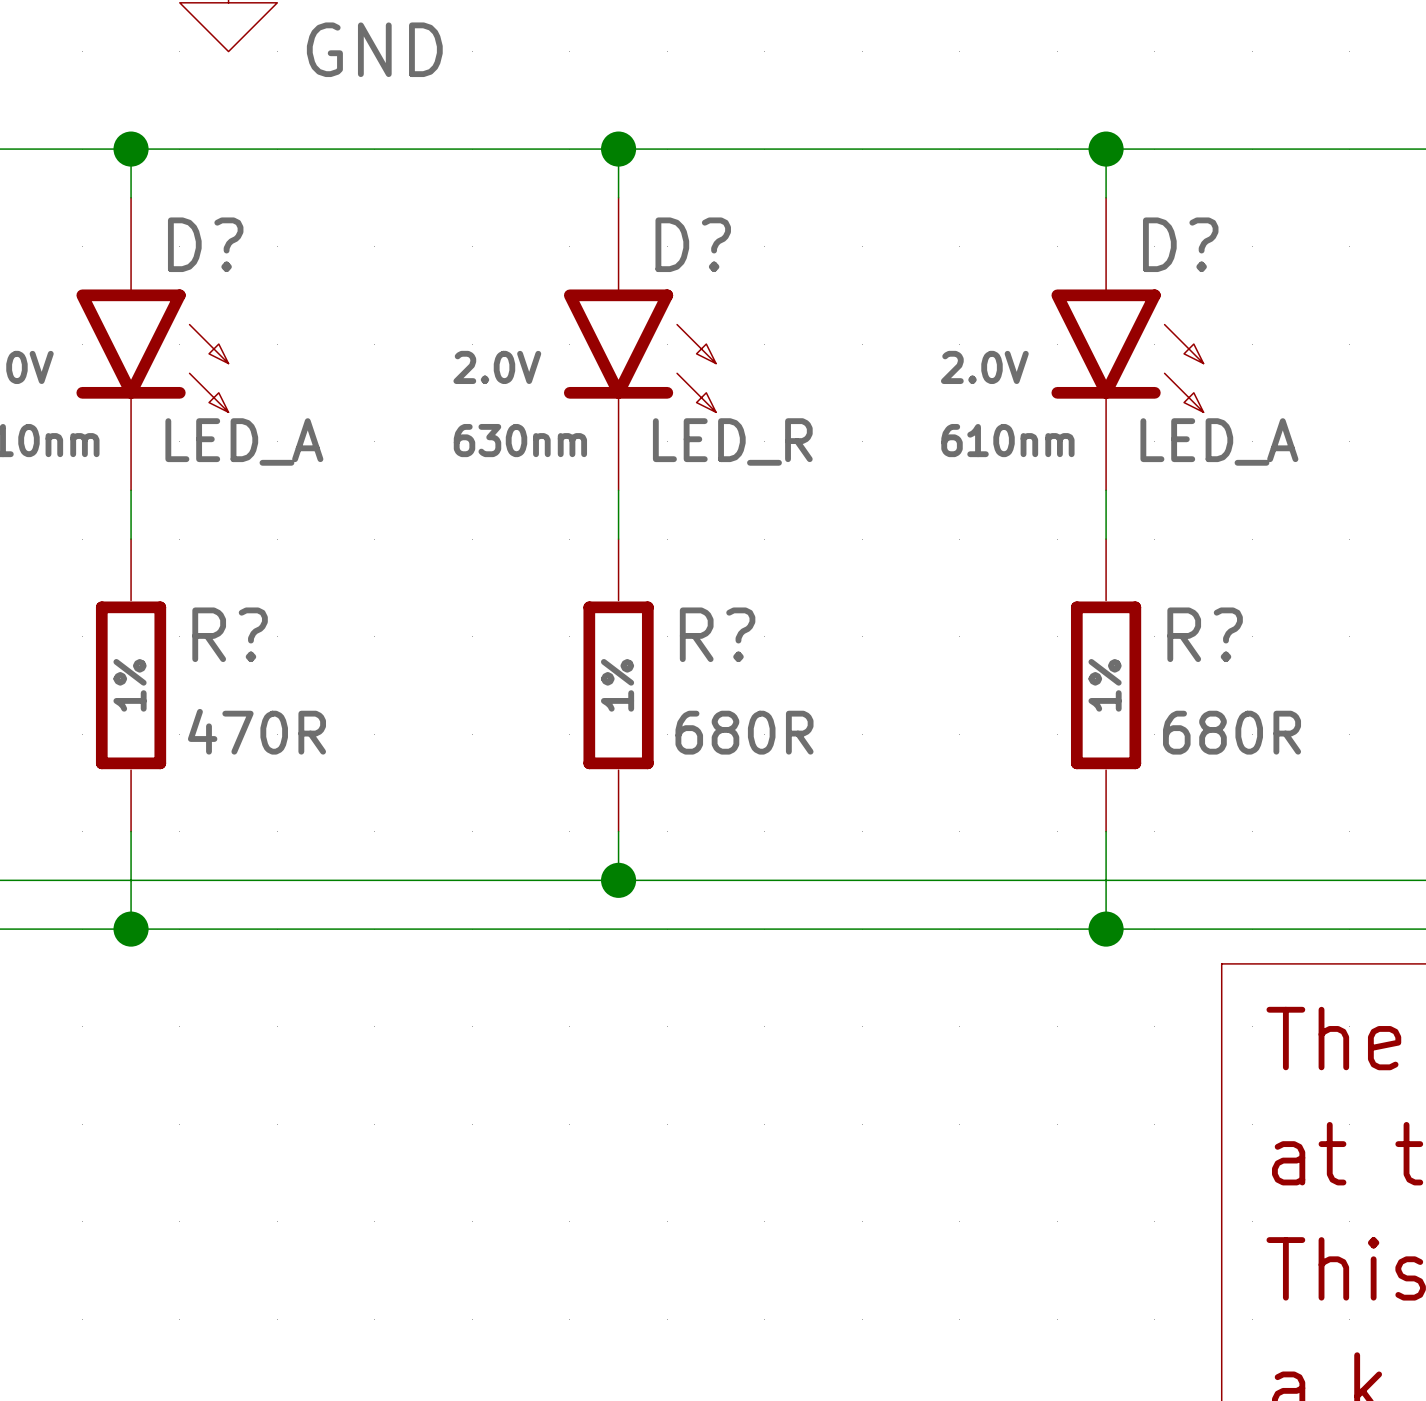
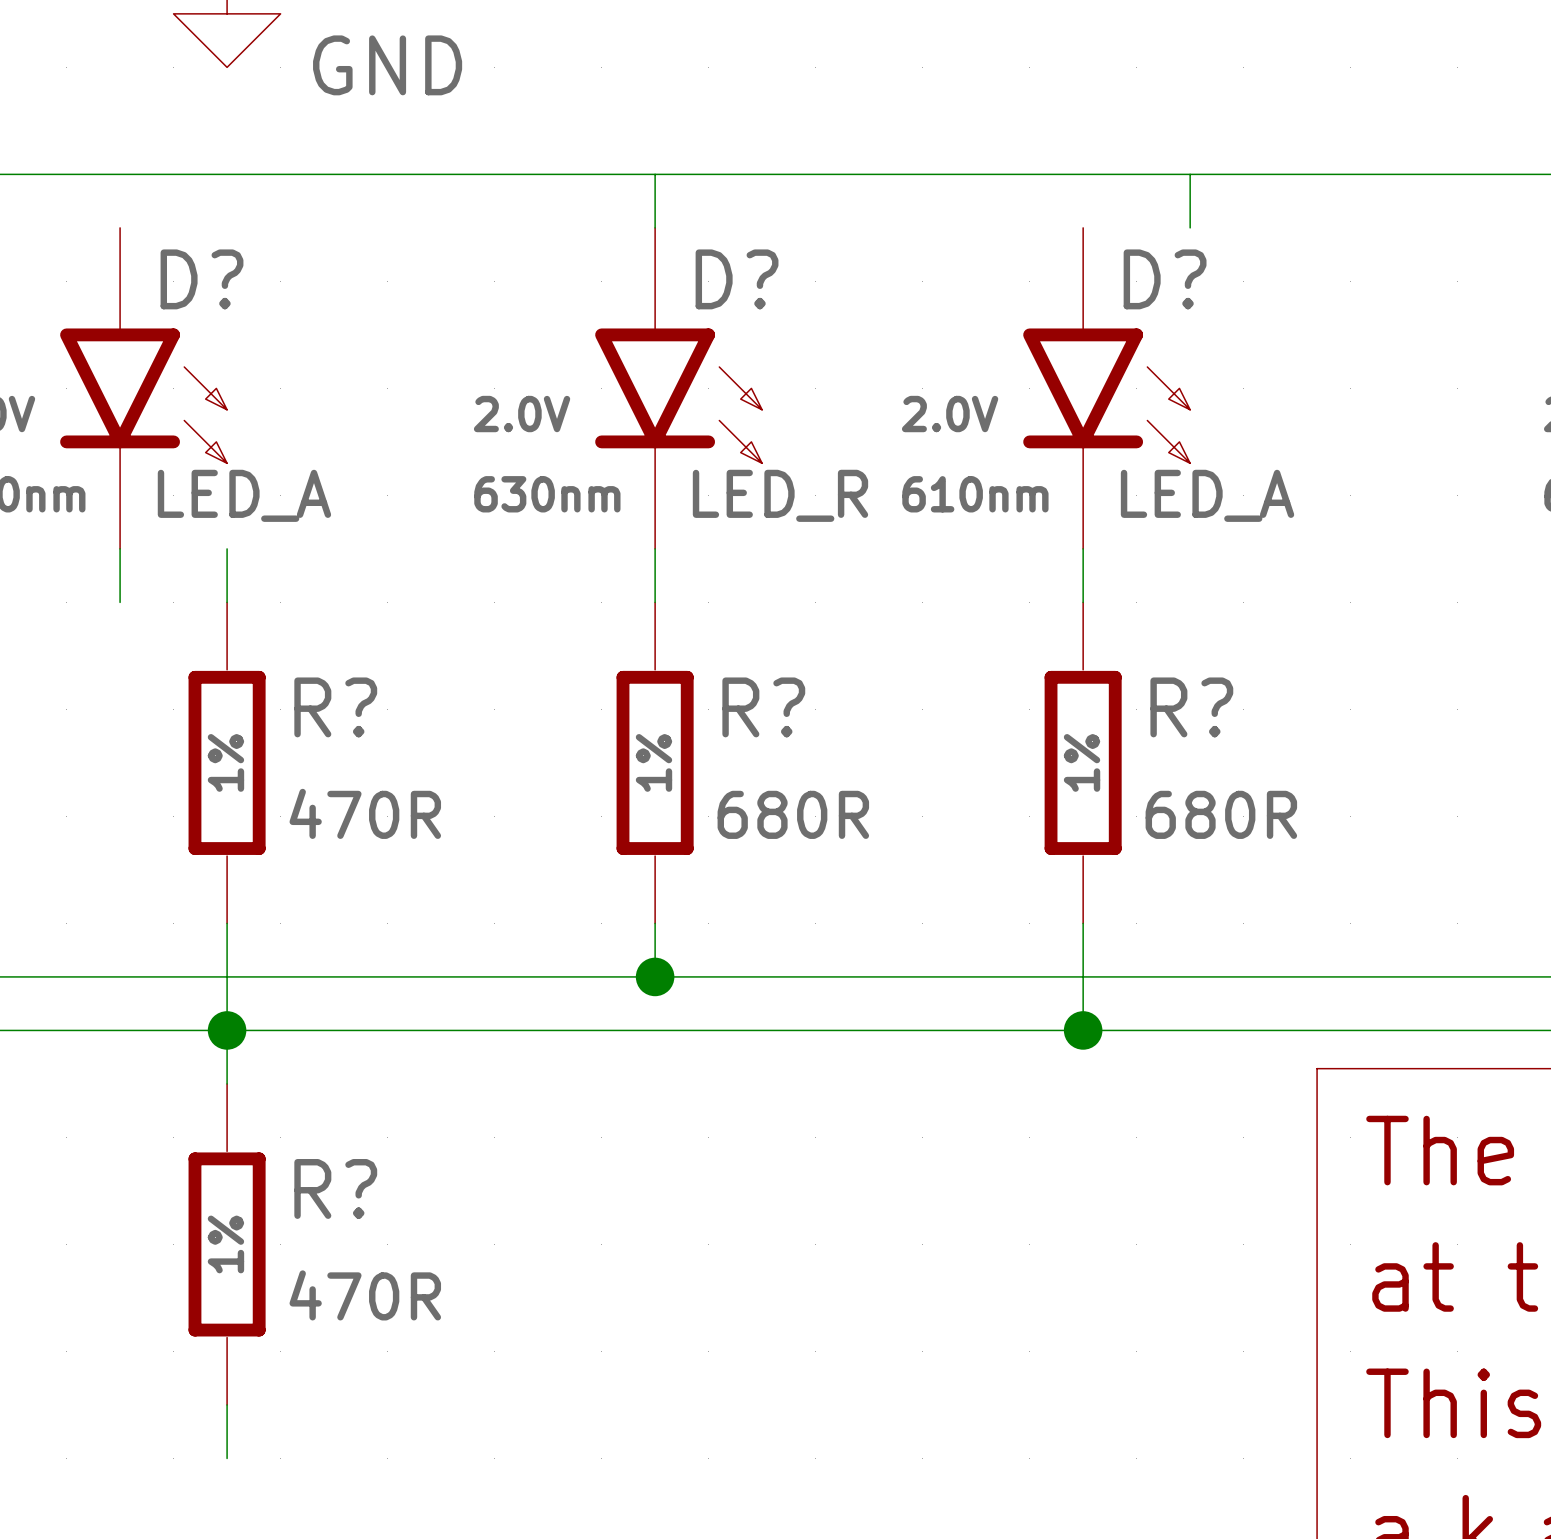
wire: (131, 149) (131, 197) -> (227, 548) (227, 602)
junction: (131, 149) -> none
junction: (618, 149) -> none
junction: (1106, 149) -> none
D? position: (1127, 344) -> (1106, 388)
wire: (1106, 490) (1106, 539) -> (1083, 548) (1083, 602)
R? position: (131, 685) -> (227, 762)
R? position: (1106, 685) -> (1083, 762)
wire: (131, 831) (131, 929) -> none
wire: none -> (227, 923) (227, 1083)
wire: (1106, 831) (1106, 929) -> (1083, 923) (1083, 1030)
junction position: (131, 929) -> (227, 1030)
junction position: (1106, 929) -> (1083, 1030)
R?: none -> 470R (227, 1244)
wire: none -> (227, 1404) (227, 1458)

